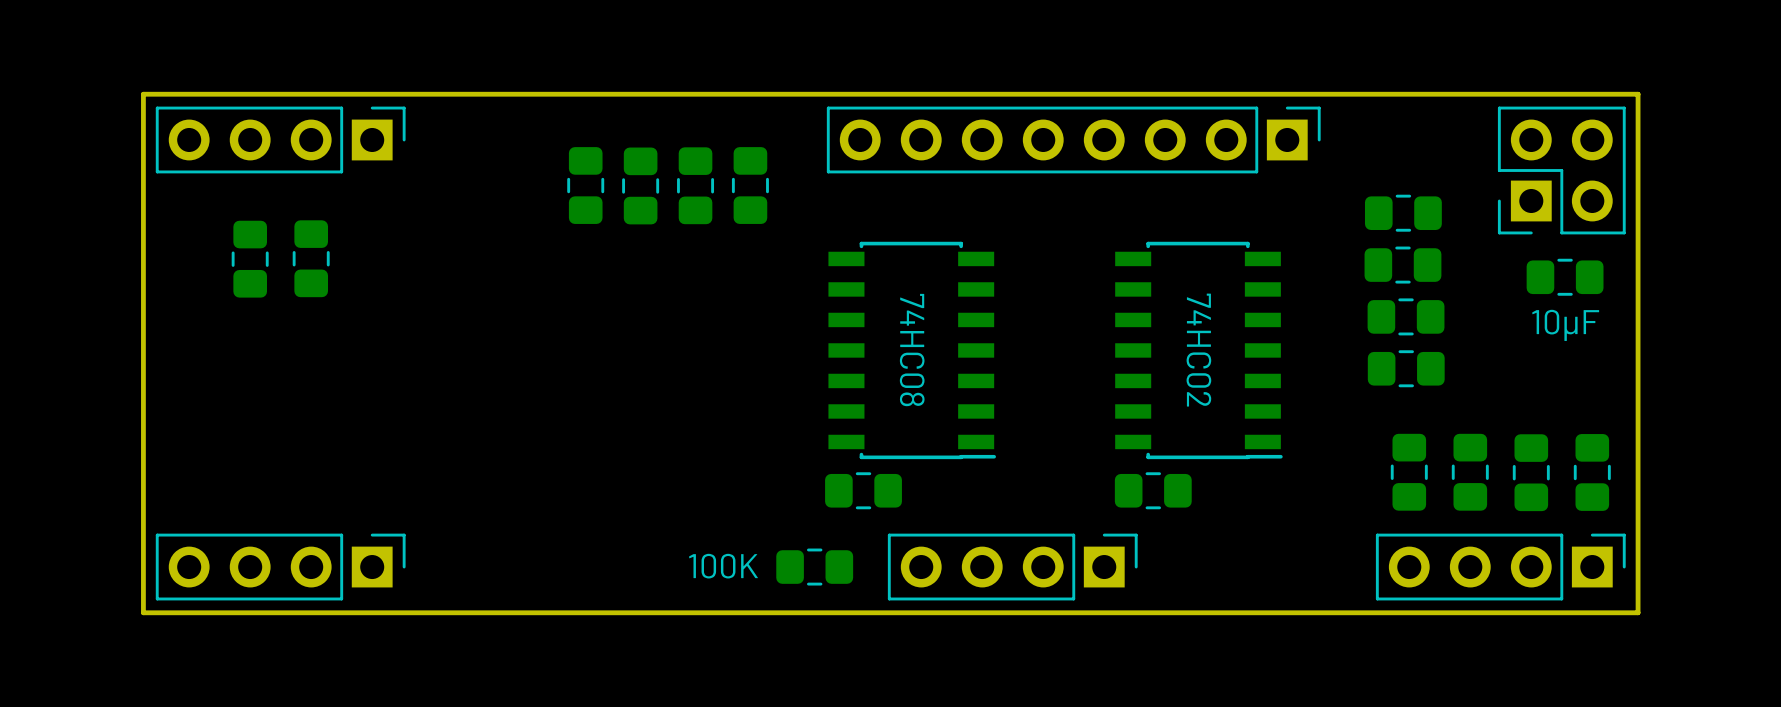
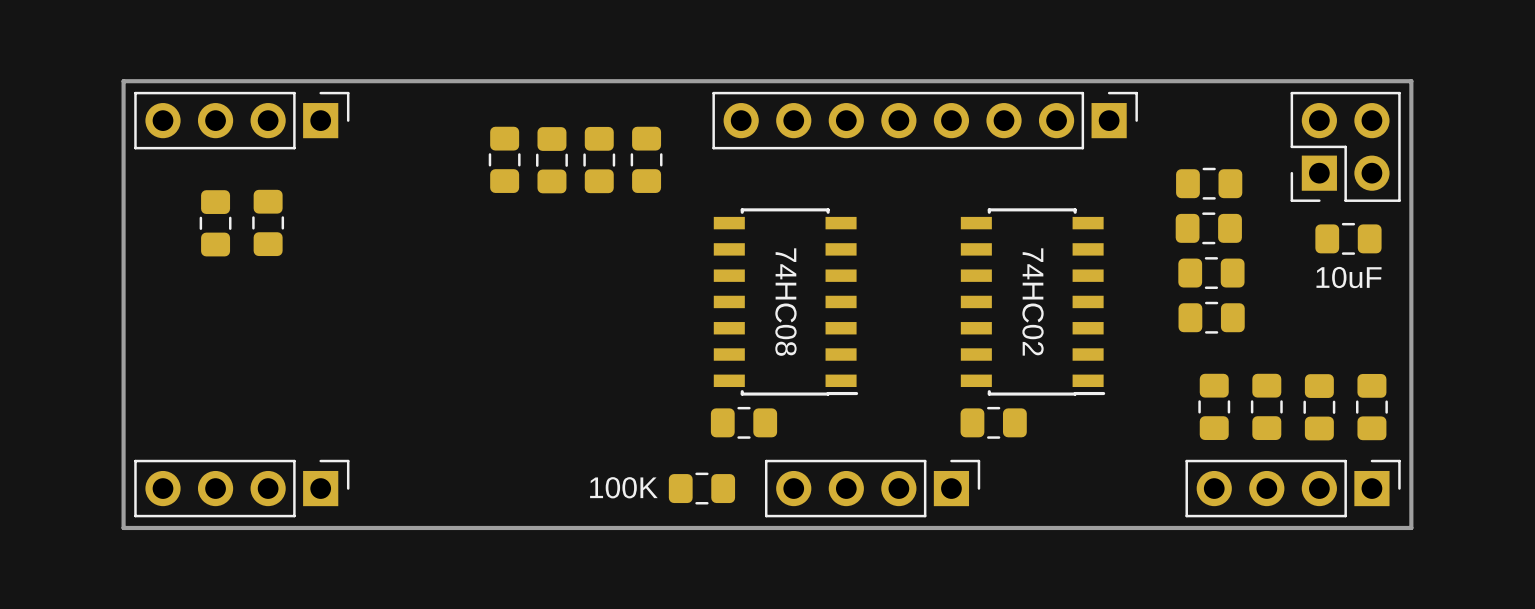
part value: 10μF (1565, 325) -> 10uF (1349, 277)

